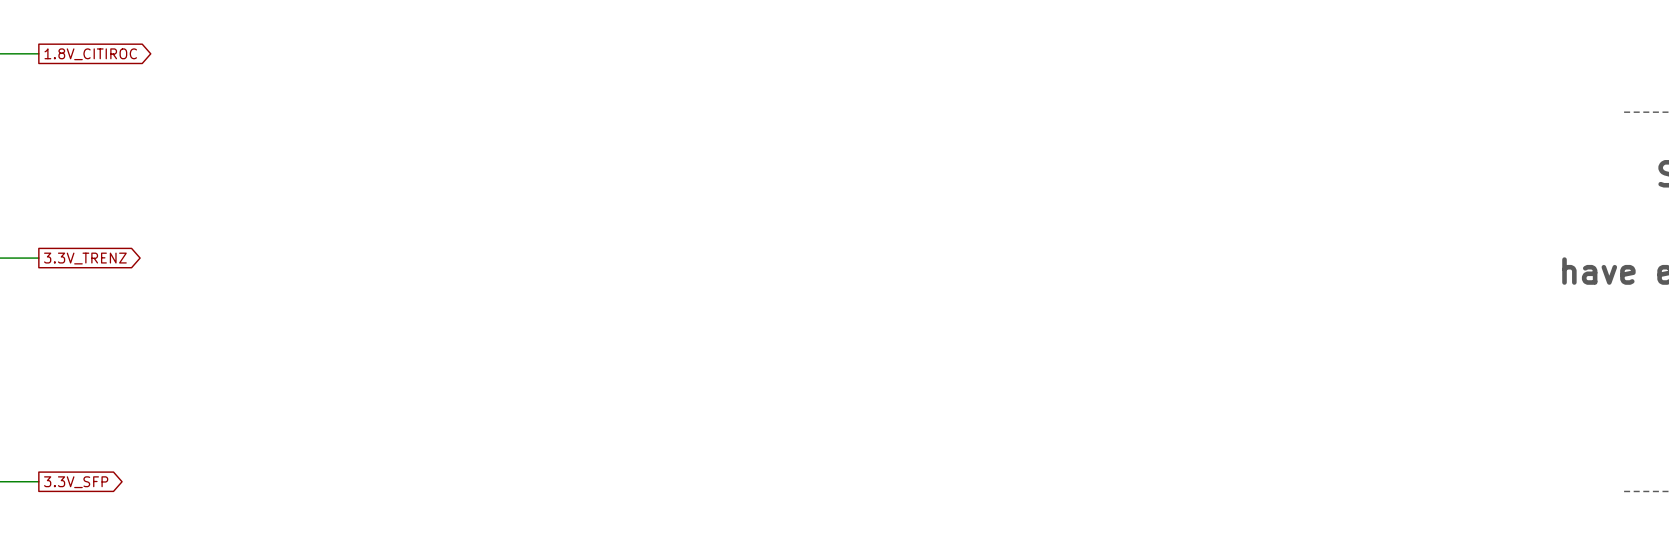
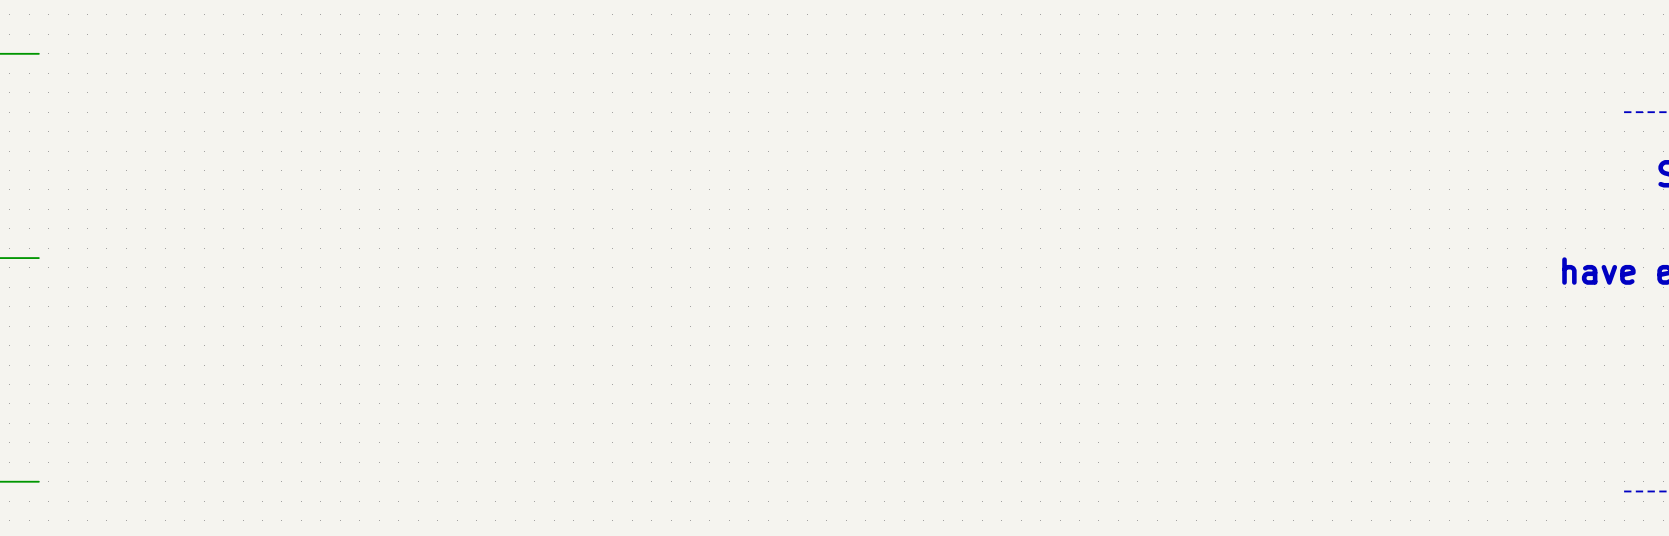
global label: 1.8V_CITIROC (90, 54) -> none
global label: 3.3V_TRENZ (85, 258) -> none
global label: 3.3V_SFP (76, 482) -> none

